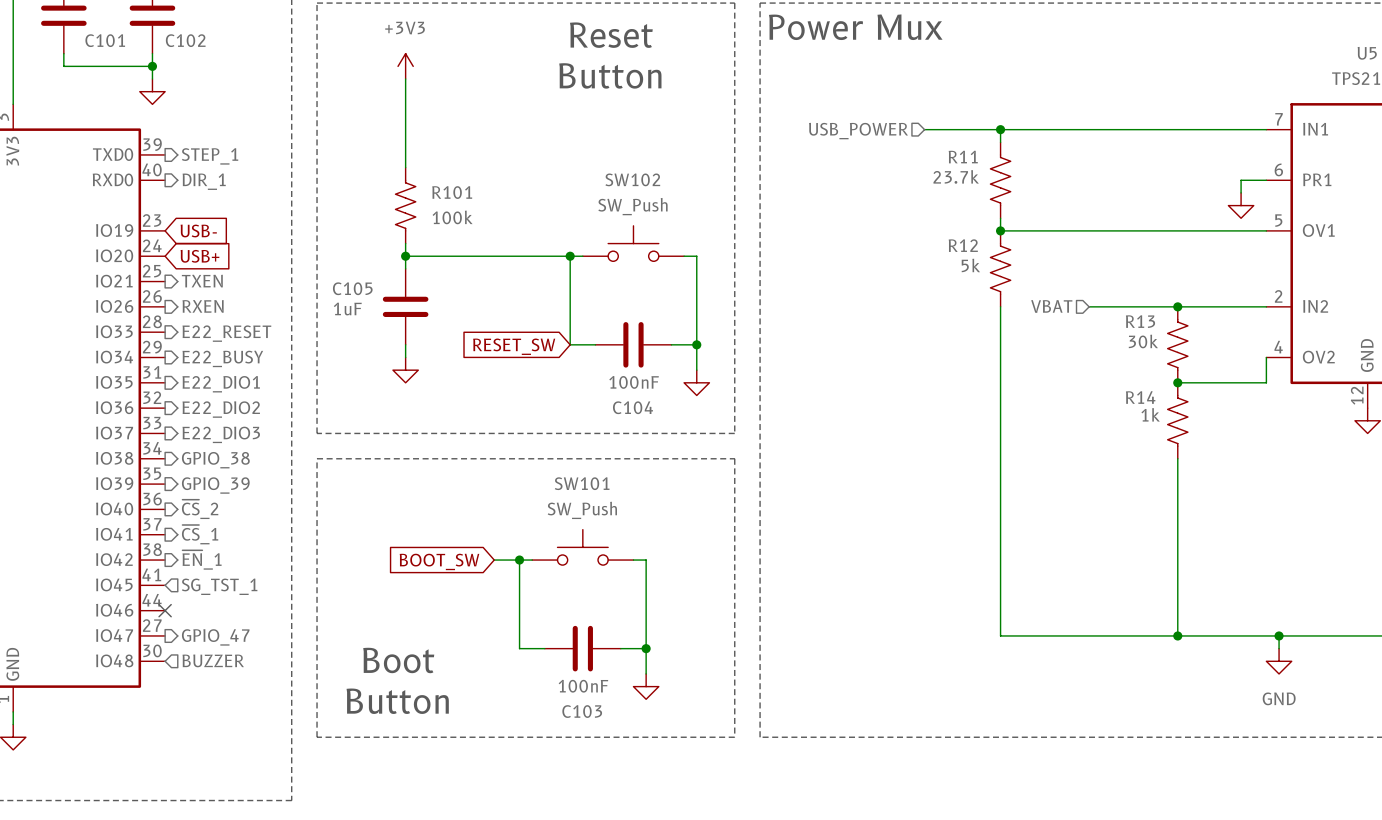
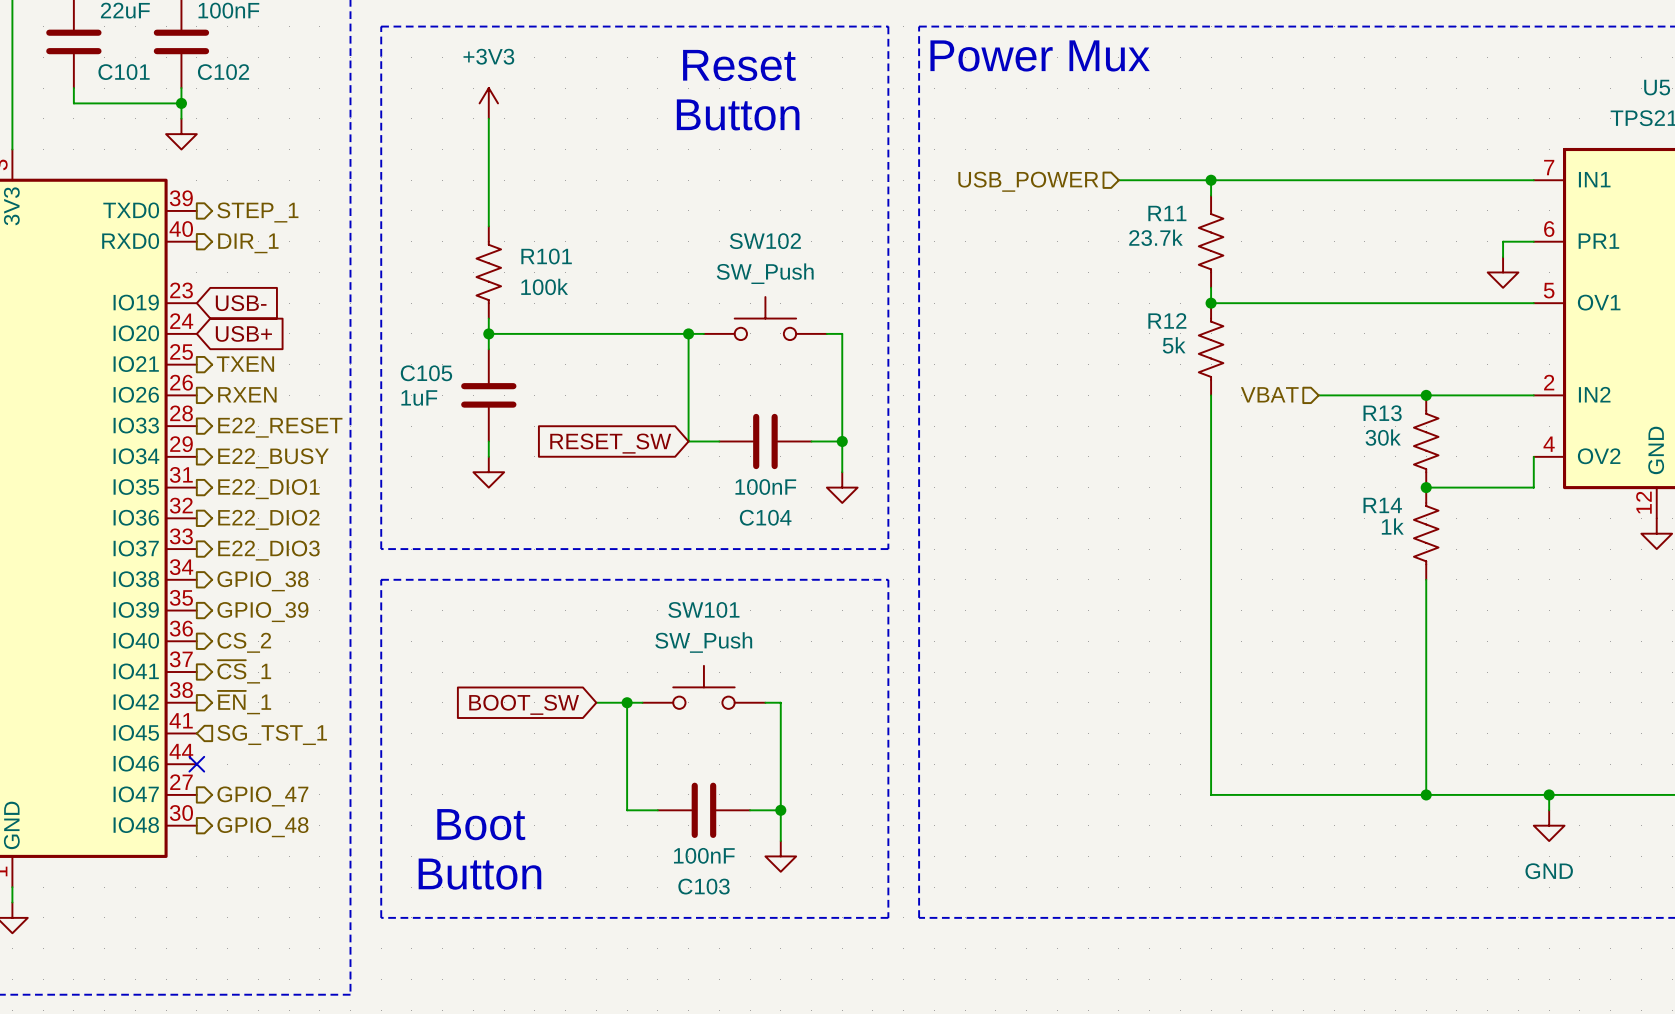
hierarchical label: ~{CS}_2 (200, 509) -> CS_2 (244, 642)
hierarchical label shape: input (213, 660) -> output (262, 827)
hierarchical label: BUZZER (213, 660) -> GPIO_48 (262, 827)

